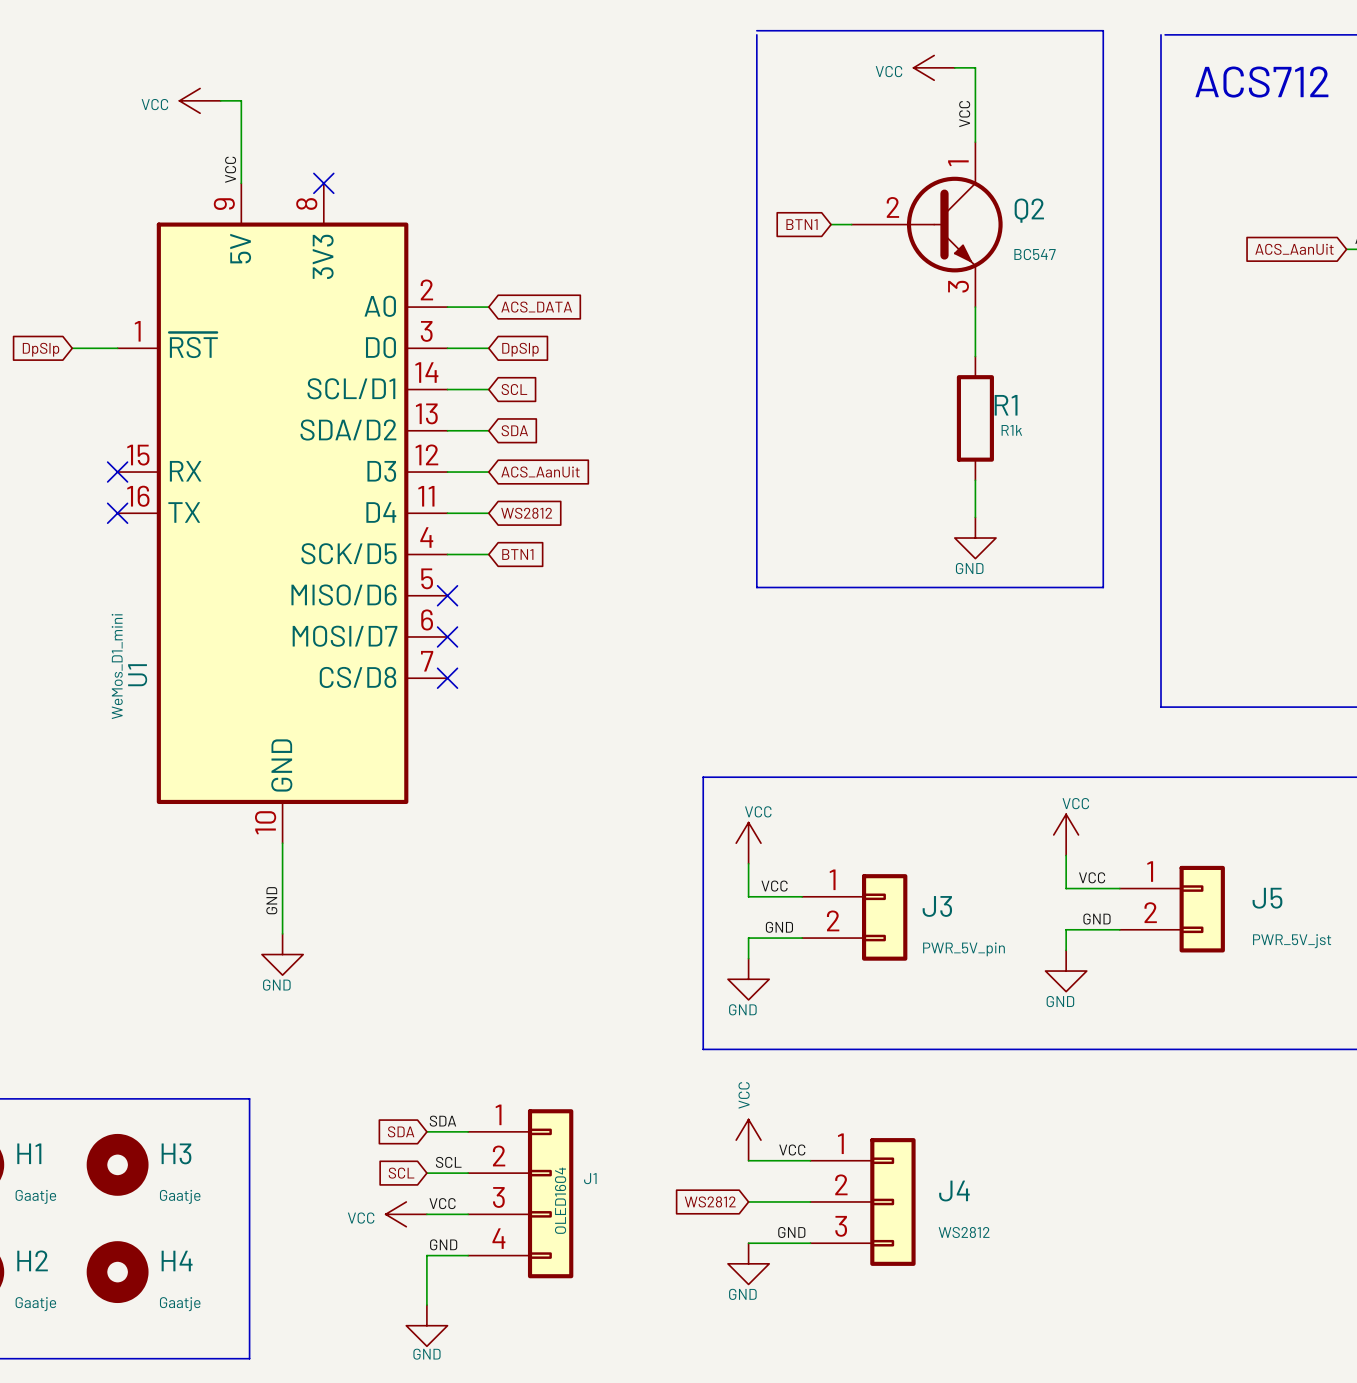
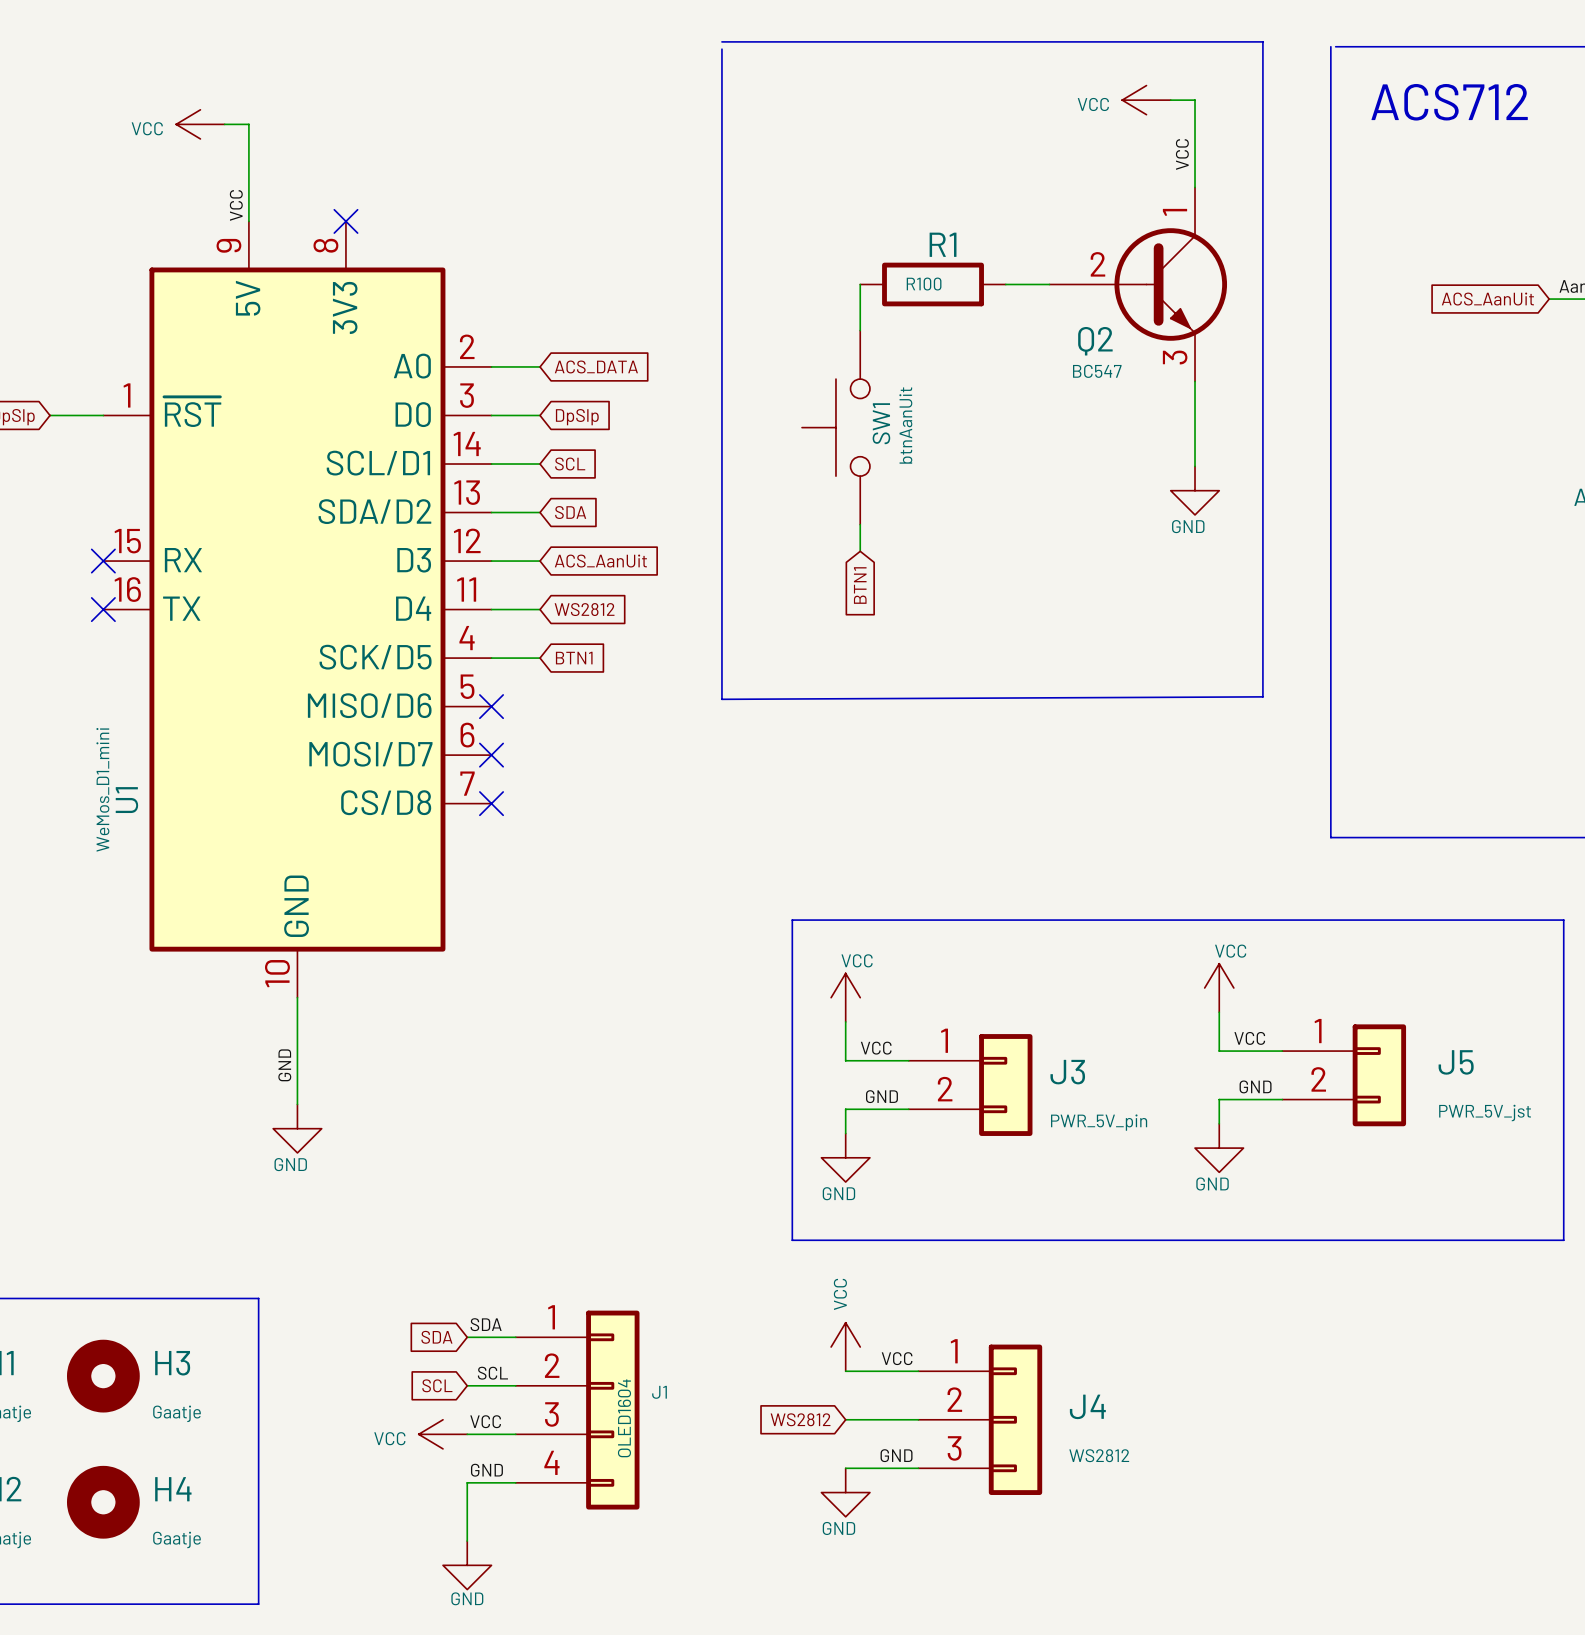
line: none -> (721, 41) (855, 41)
line: (756, 34) (756, 587) (1103, 587) -> (721, 49) (721, 699) (1262, 696)
power symbol position: VCC (934, 67) -> VCC (1146, 100)
wire: (954, 67) (975, 67) (975, 142) -> (1170, 100) (1195, 100) (1195, 187)
label position: VCC (964, 114) -> VCC (1182, 154)
Q2 name position: Q2 (1029, 210) -> Q2 (1095, 341)
global label rotation: 0° (802, 224) -> 90° counterclockwise (860, 585)
global label position: BTN1 (802, 224) -> BTN1 (860, 585)
wire: (831, 224) (851, 224) -> none
Q2 position: (927, 224) -> (1138, 284)
wire: none -> (860, 284) (860, 330)
wire: none -> (1005, 284) (1049, 284)
Q2 value position: BC547 (1035, 254) -> BC547 (1097, 371)
wire: (975, 307) (975, 356) -> none
wire: none -> (1195, 381) (1195, 466)
SW1: none -> btnAanUit (835, 427)
R1 name position: R1 (1006, 405) -> R1 (943, 244)
R1 rotation: 0° (975, 418) -> 90° clockwise (933, 284)
R1 position: (975, 418) -> (933, 284)
R1 value: R1k (1011, 430) -> R100 (924, 284)
wire: none -> (860, 524) (860, 551)
wire: (975, 480) (975, 517) -> none
power symbol position: GND (975, 538) -> GND (1195, 490)

